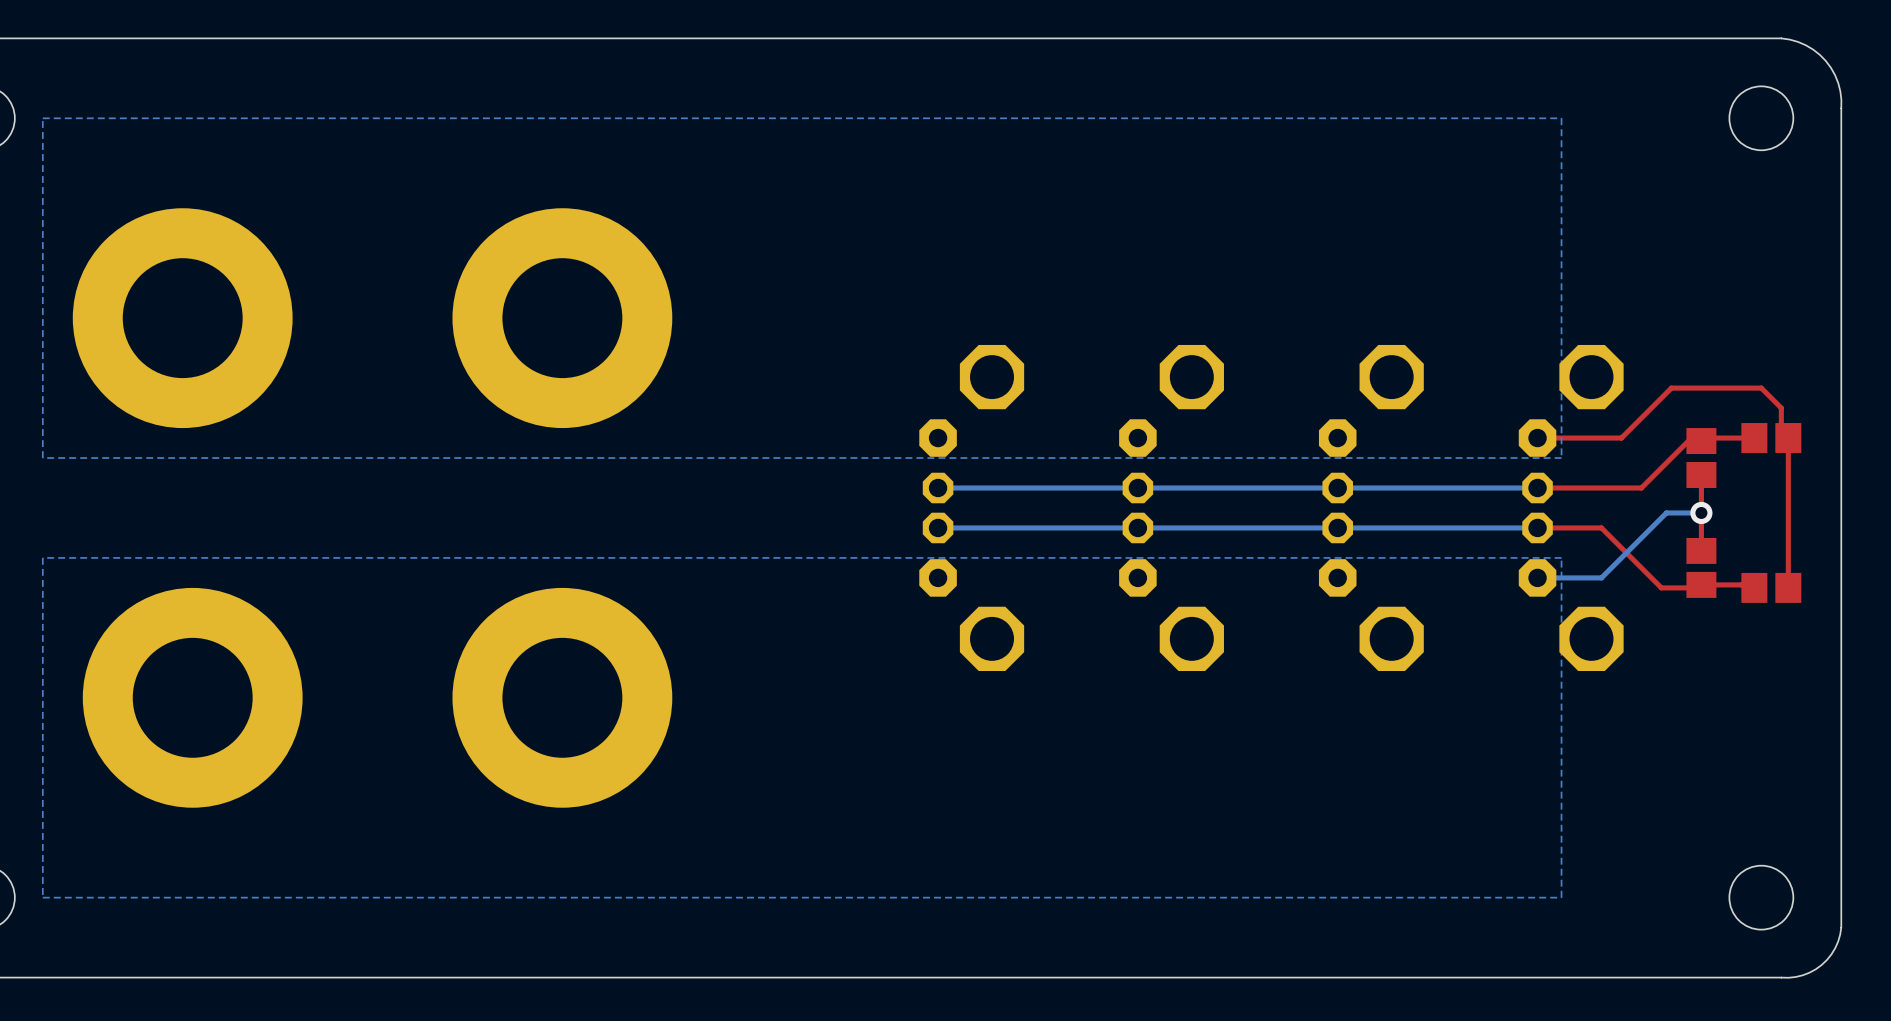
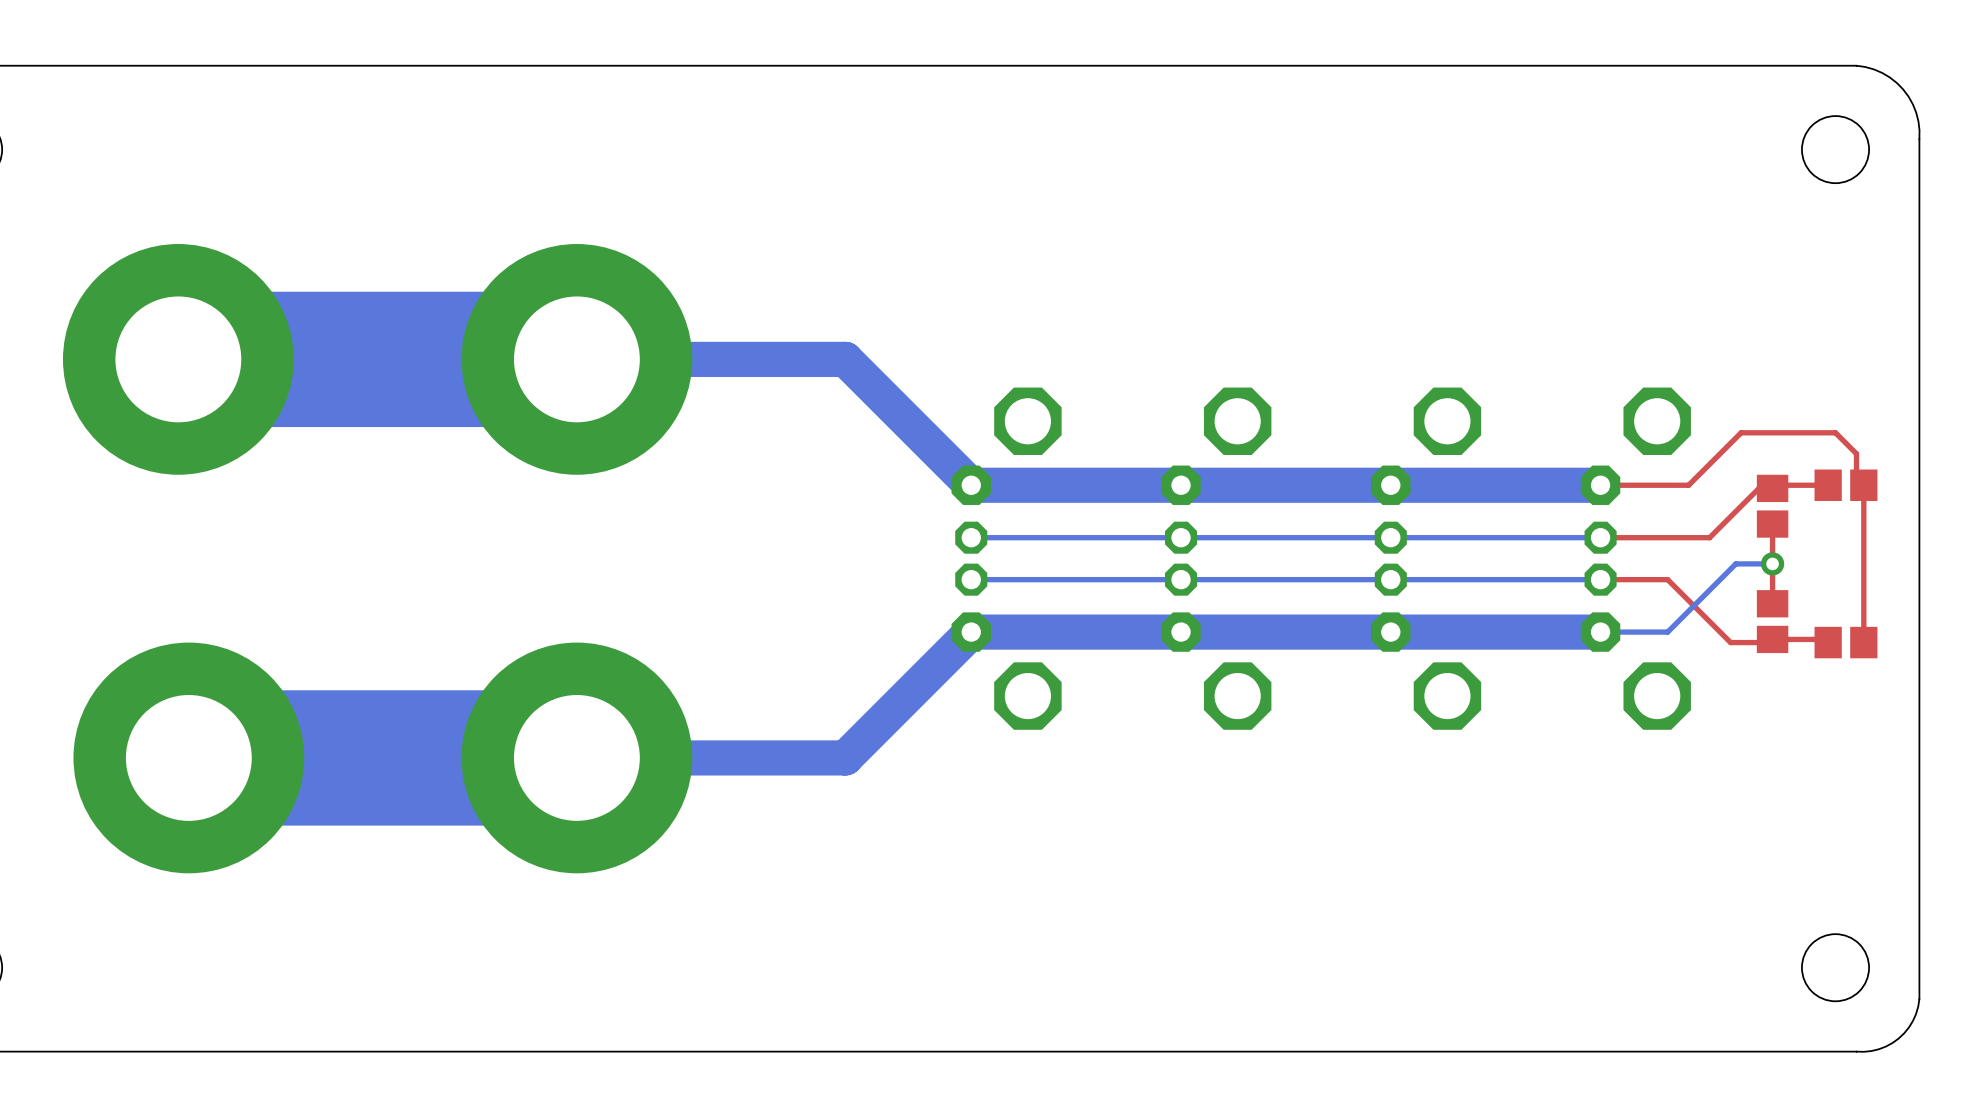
bottom zone outline: (1561, 118) (42, 118) (42, 458) (1561, 458) (1561, 118) -> none
bottom track: none -> (178, 359) (845, 359) (971, 485) (1600, 485)
bottom zone outline: (1561, 557) (1561, 897) (42, 897) (42, 557) (1561, 557) -> none
bottom track: none -> (1600, 632) (971, 632) (845, 757) (188, 757)

